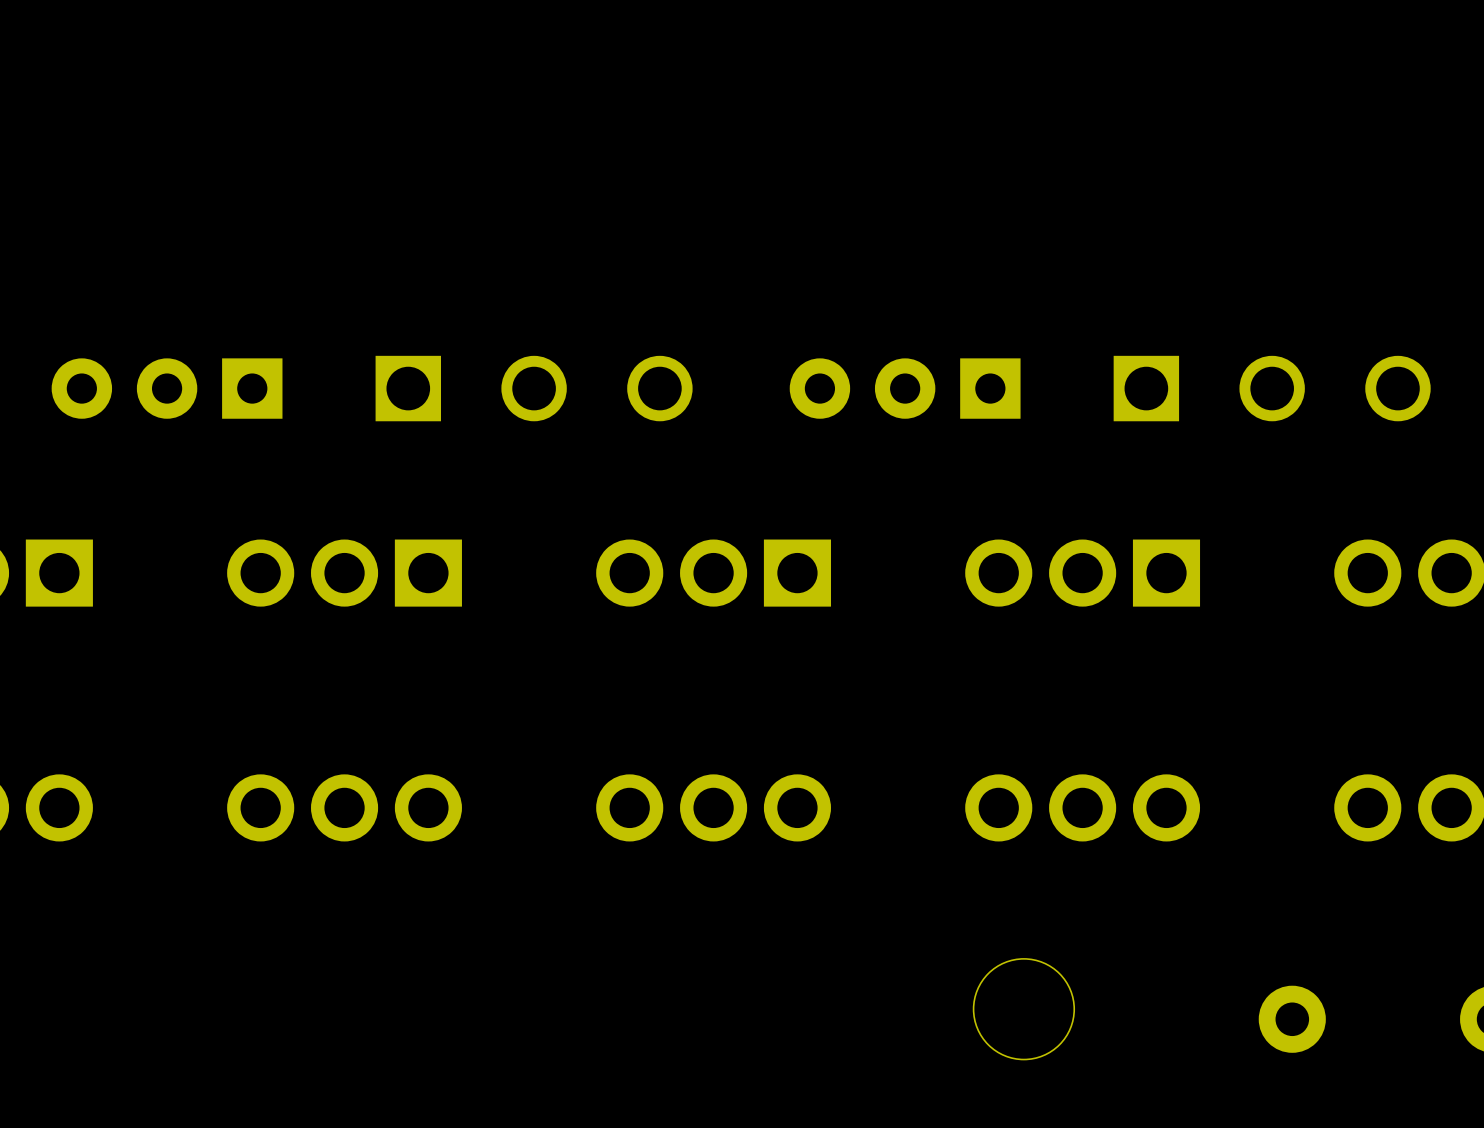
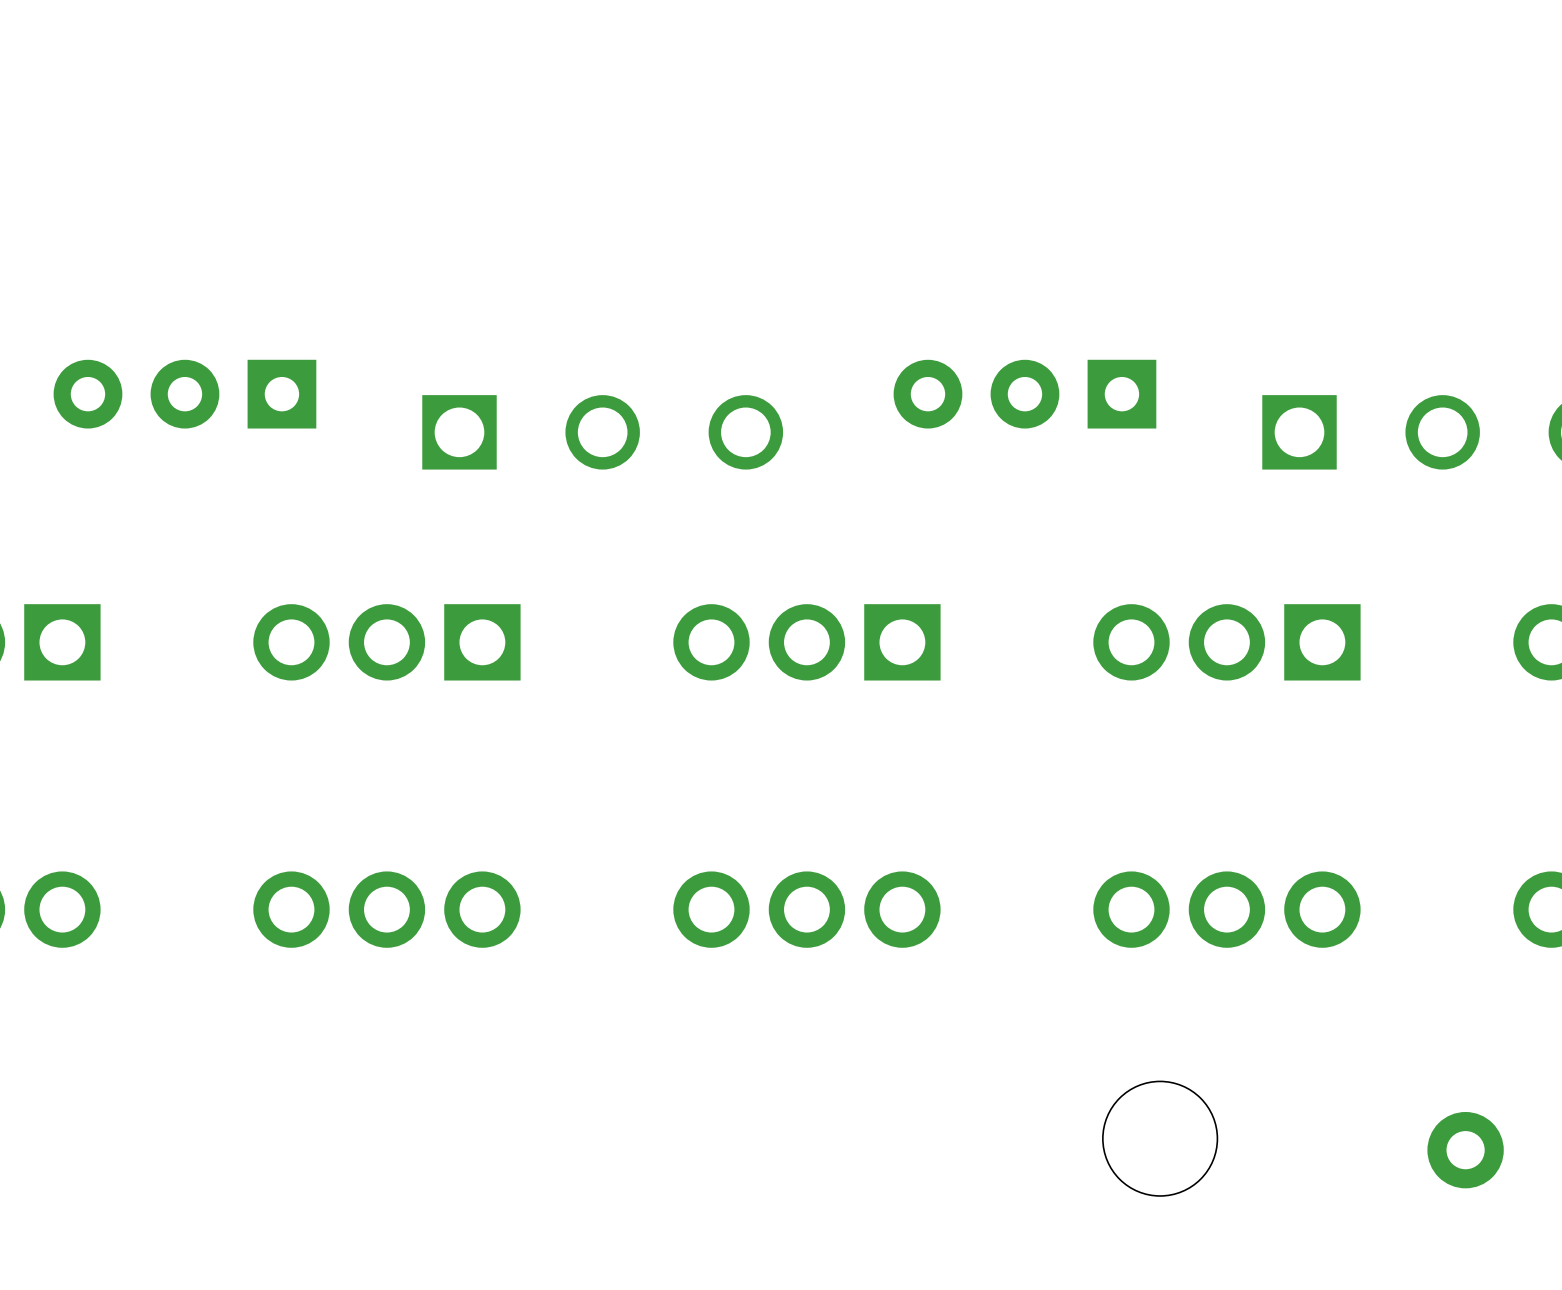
part position: (167, 388) -> (184, 394)
part position: (905, 388) -> (1024, 394)

